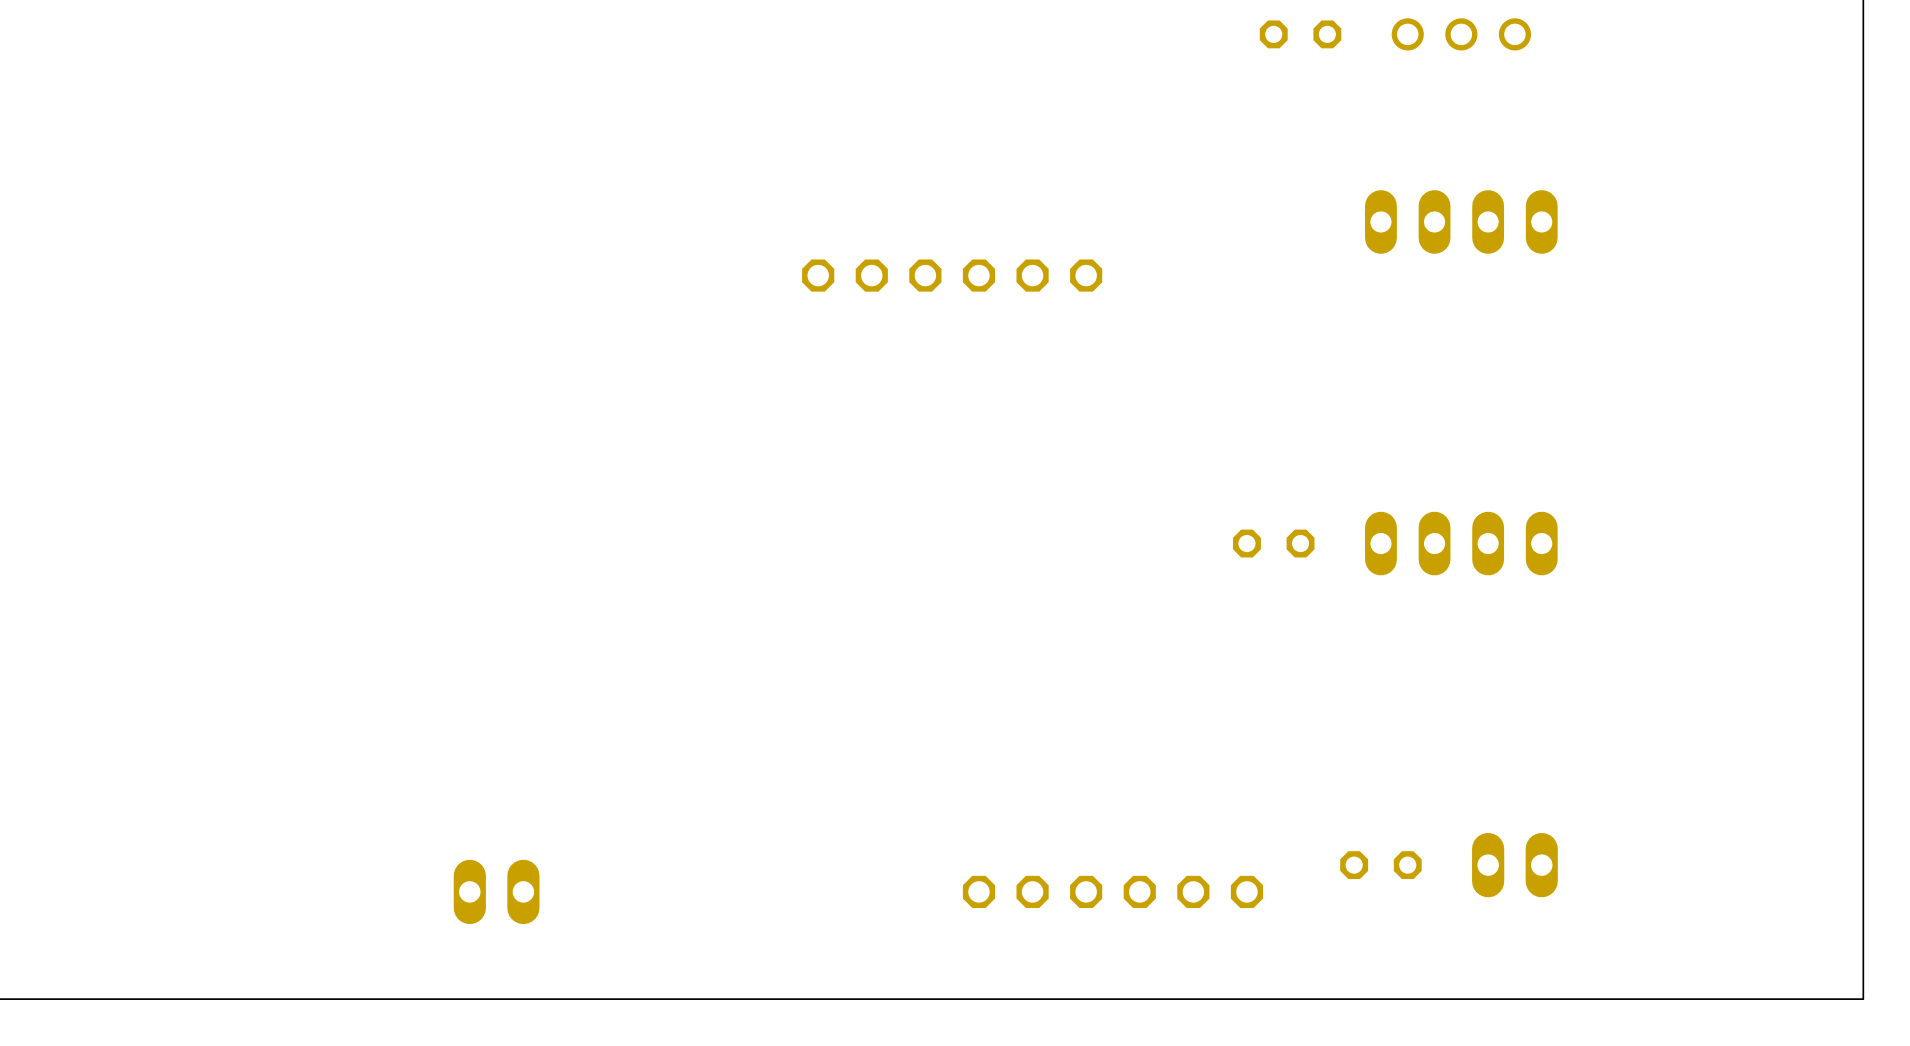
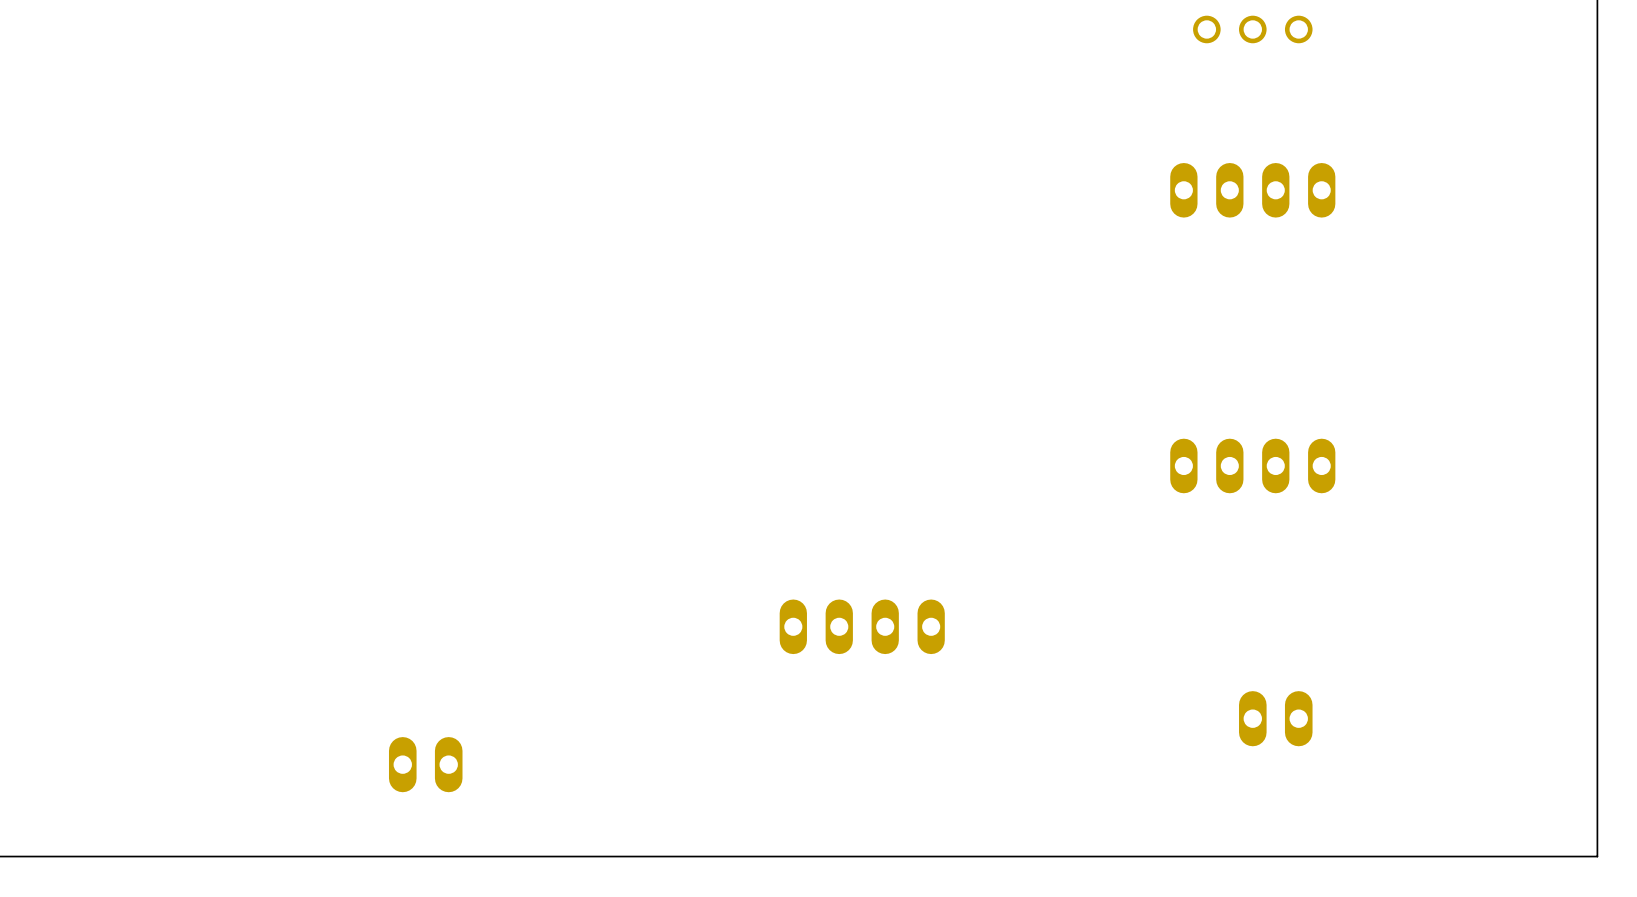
part: (1300, 34) -> none
part: (952, 275) -> none
part: (1273, 543) -> none
part: none -> (862, 626)
part: (1380, 865) -> none
part position: (1514, 865) -> (1275, 718)
part: (1112, 891) -> none

